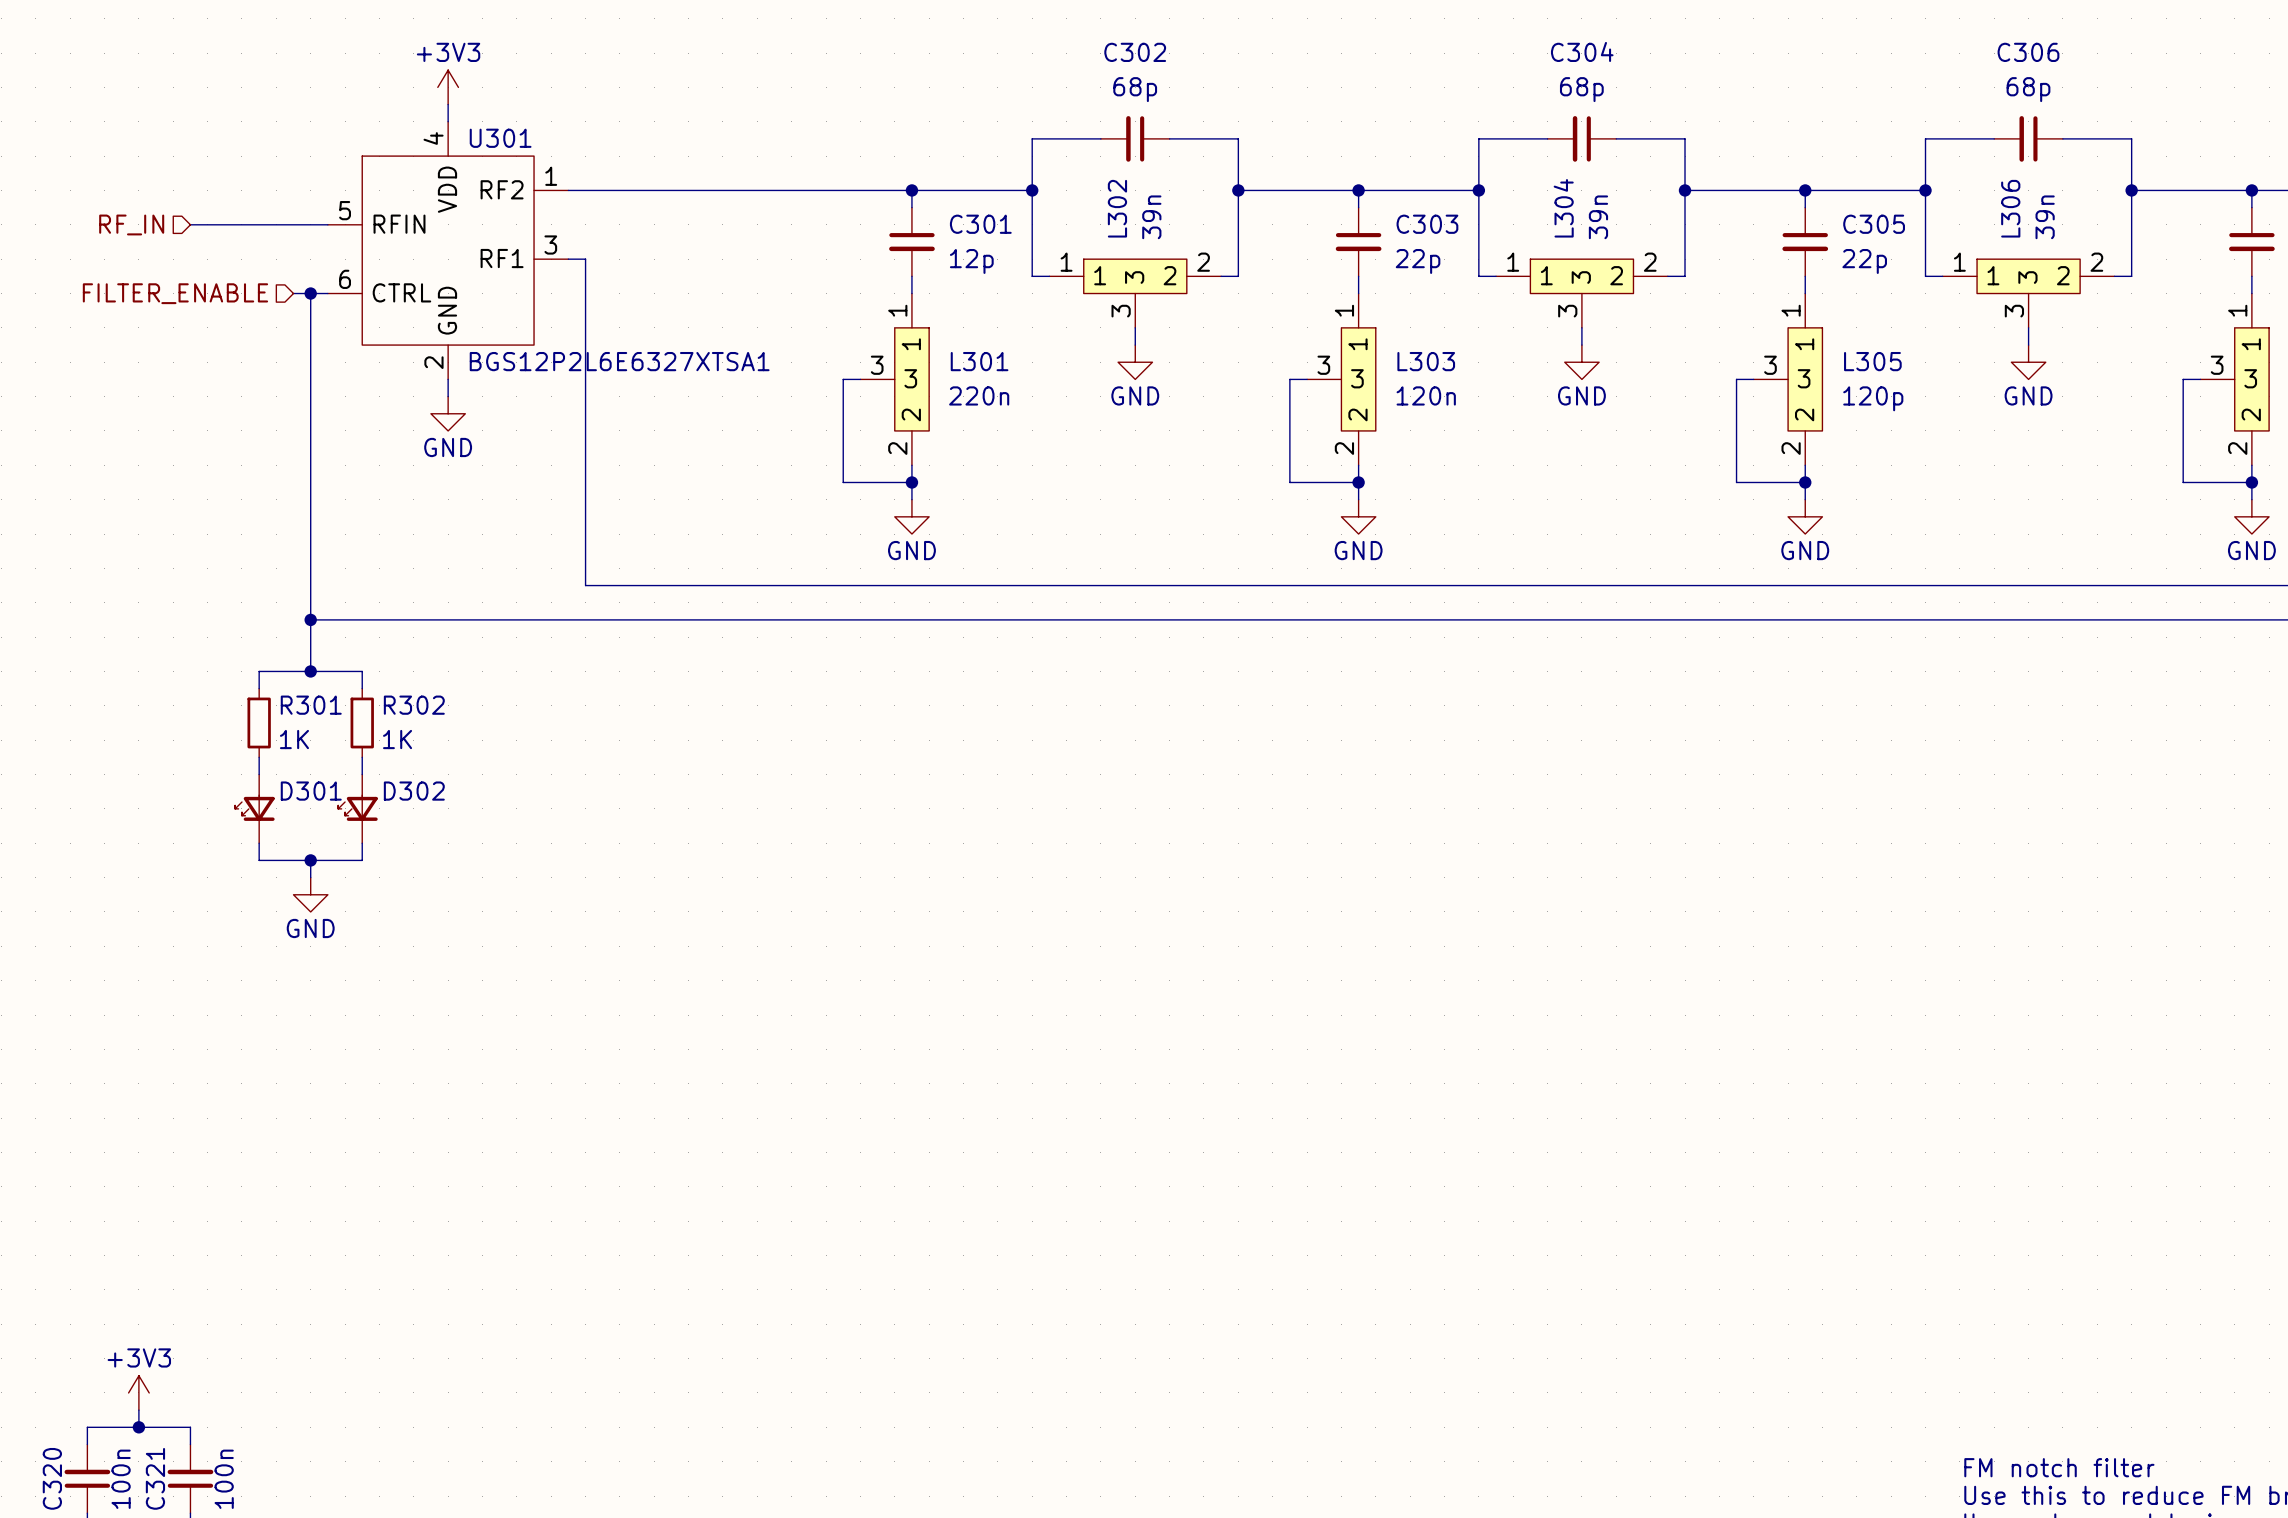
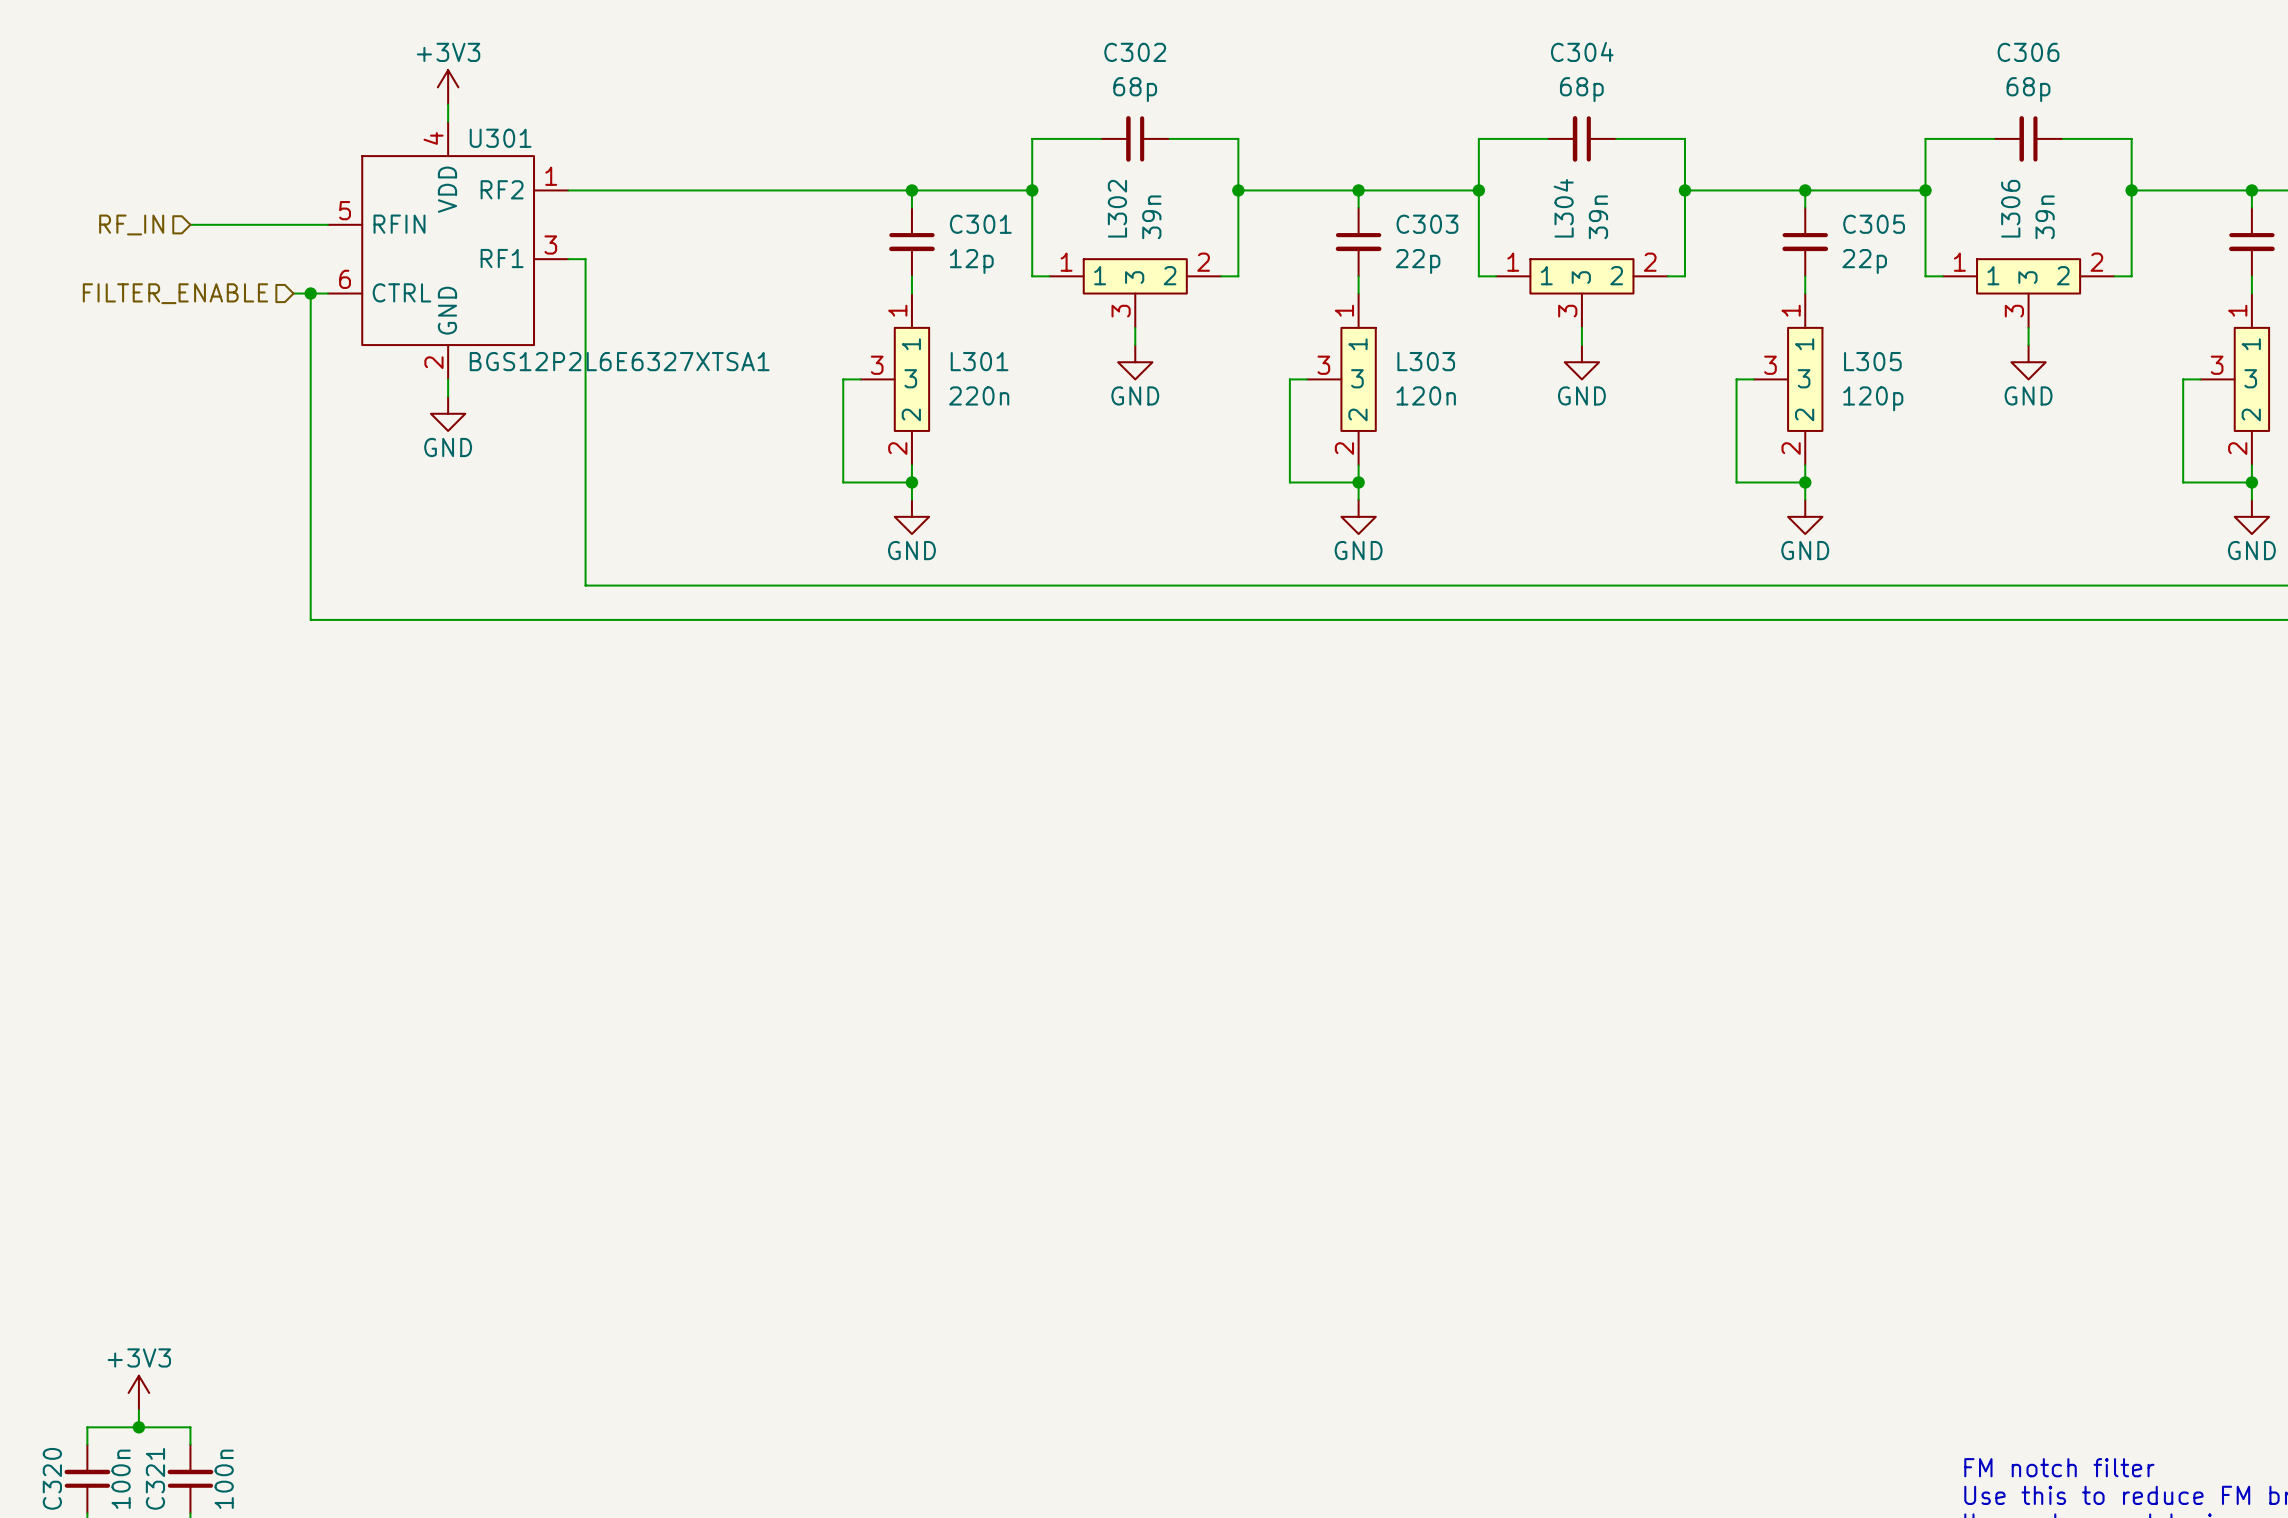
wire: (310, 619) (310, 671) -> none
junction: (310, 619) -> none
junction: (310, 671) -> none
wire: (259, 688) (259, 671) (362, 671) (362, 688) -> none
R301: 1K (259, 722) -> none
R302: 1K (362, 722) -> none
wire: (259, 757) (259, 774) -> none
wire: (362, 757) (362, 774) -> none
D301: (254, 808) -> none
D302: (357, 808) -> none
wire: (259, 843) (259, 860) (362, 860) (362, 843) -> none
wire: (310, 860) (310, 877) -> none
junction: (310, 860) -> none
power symbol: GND (310, 894) -> none

